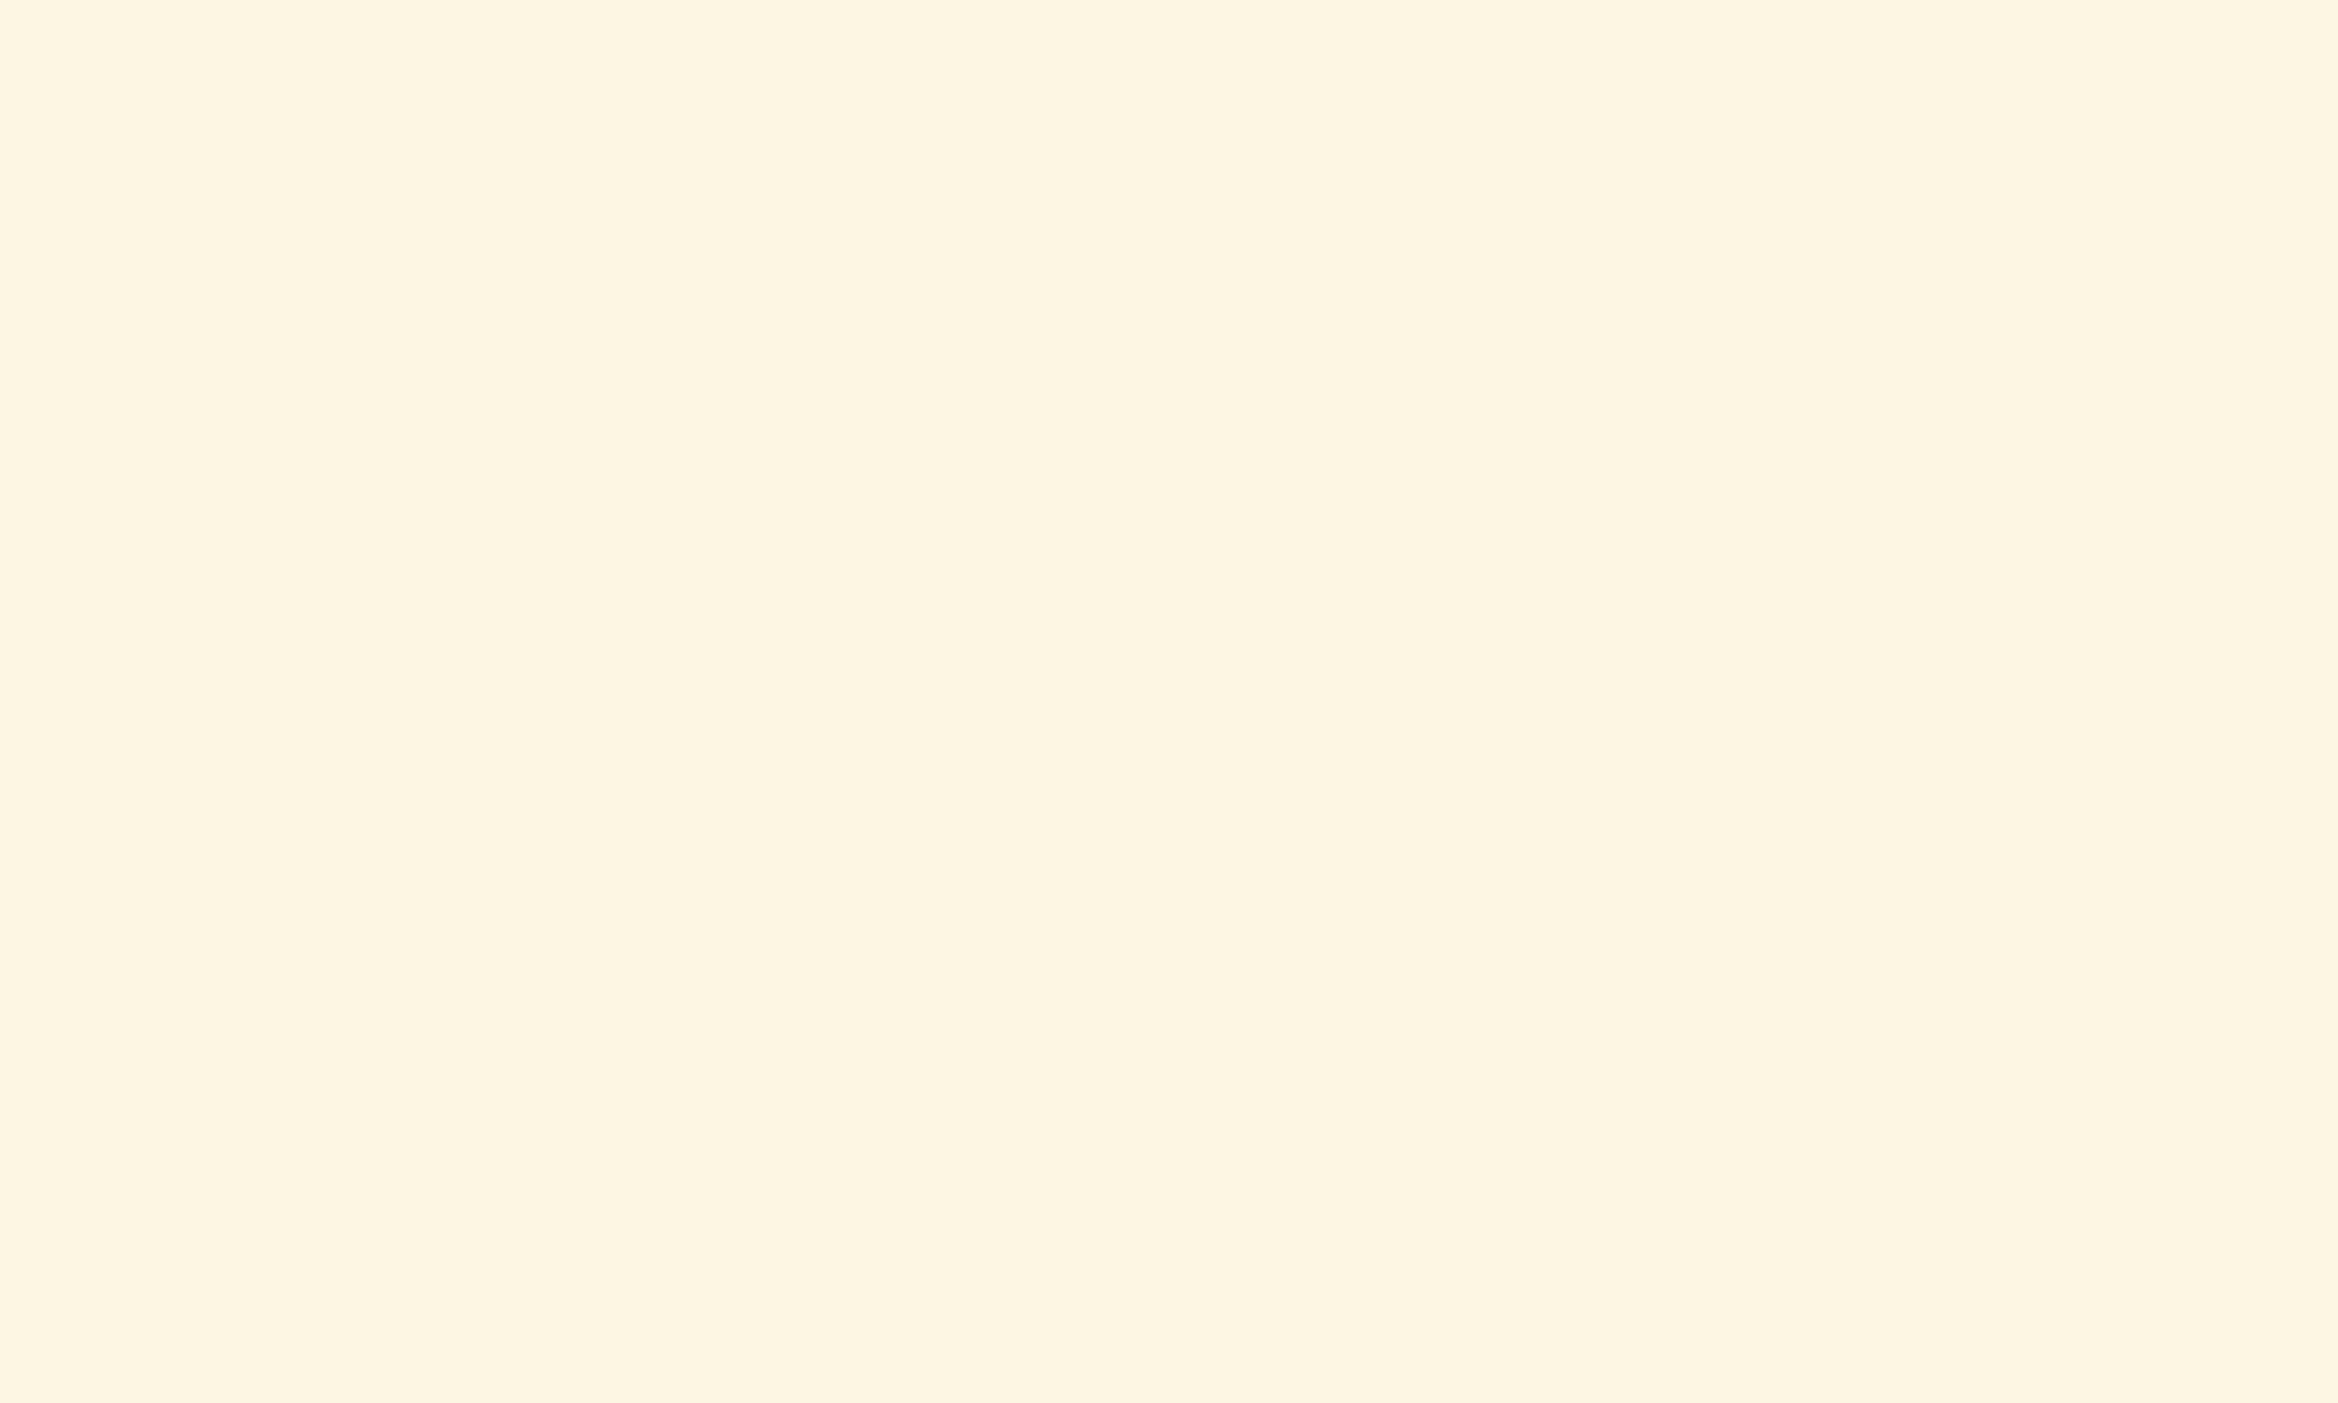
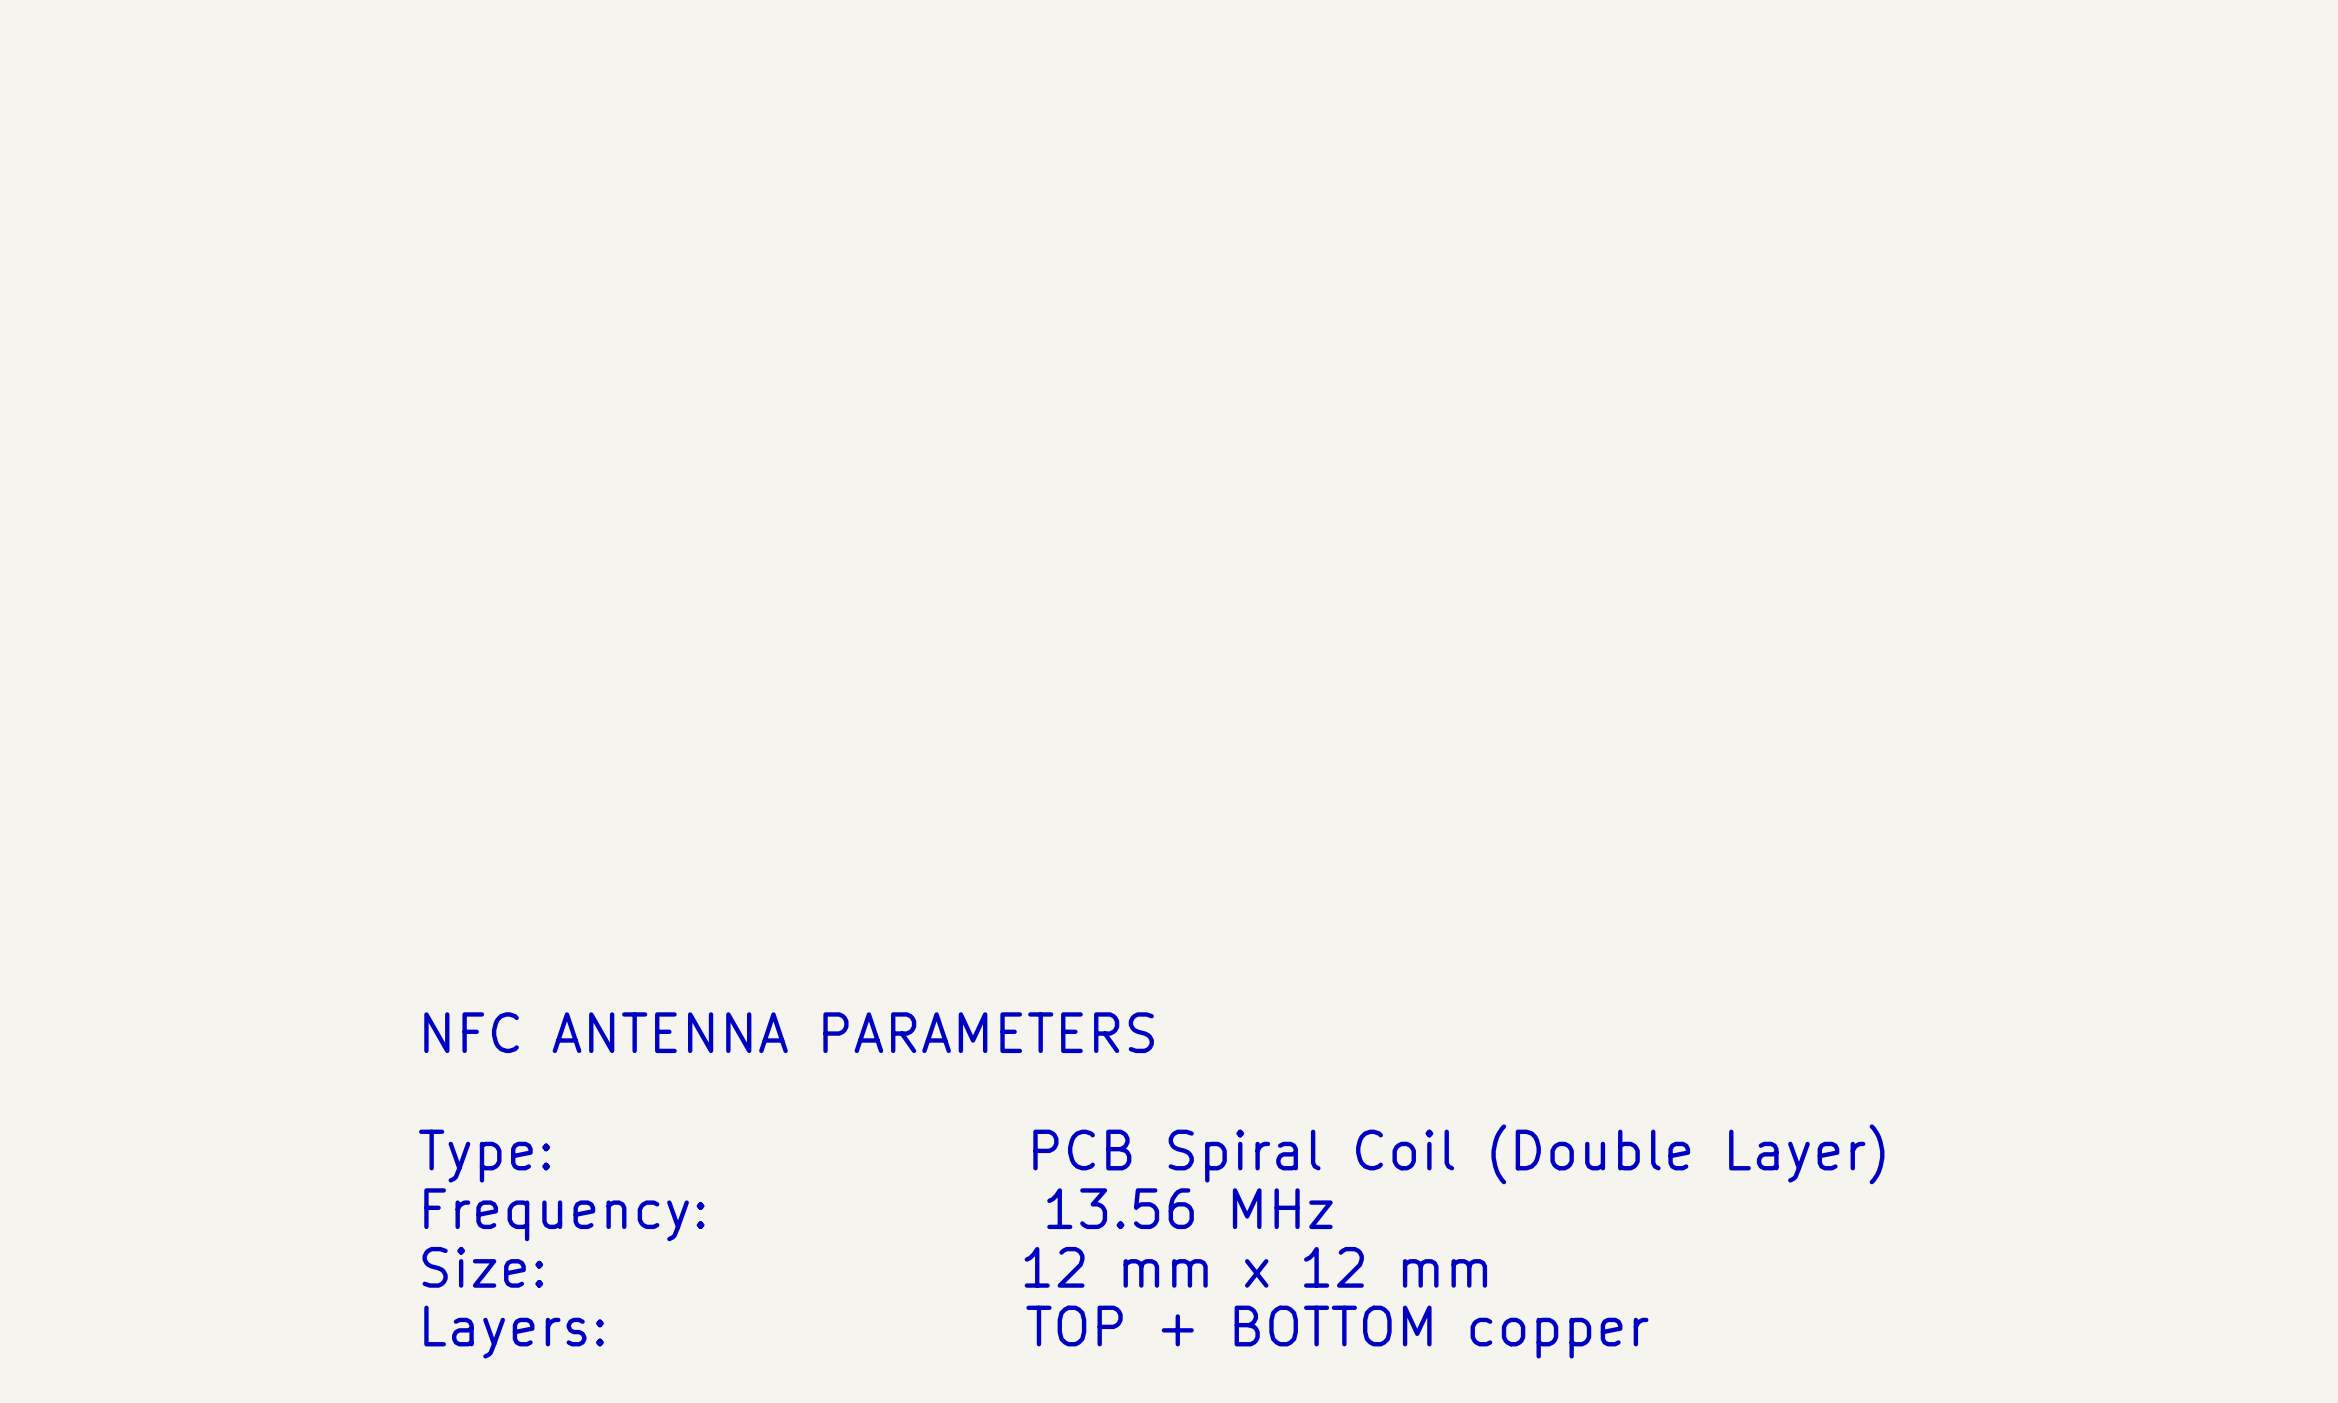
text: none -> NFC ANTENNA PARAMETERS (789, 1032)
text: none -> Type: PCB Spiral Coil (Double Layer) (1151, 1154)
text: none -> Frequency: 13.56 MHz (878, 1214)
text: none -> Size: 12 mm x 12 mm (954, 1267)
text: none -> Layers: TOP + BOTTOM copper (1036, 1332)

